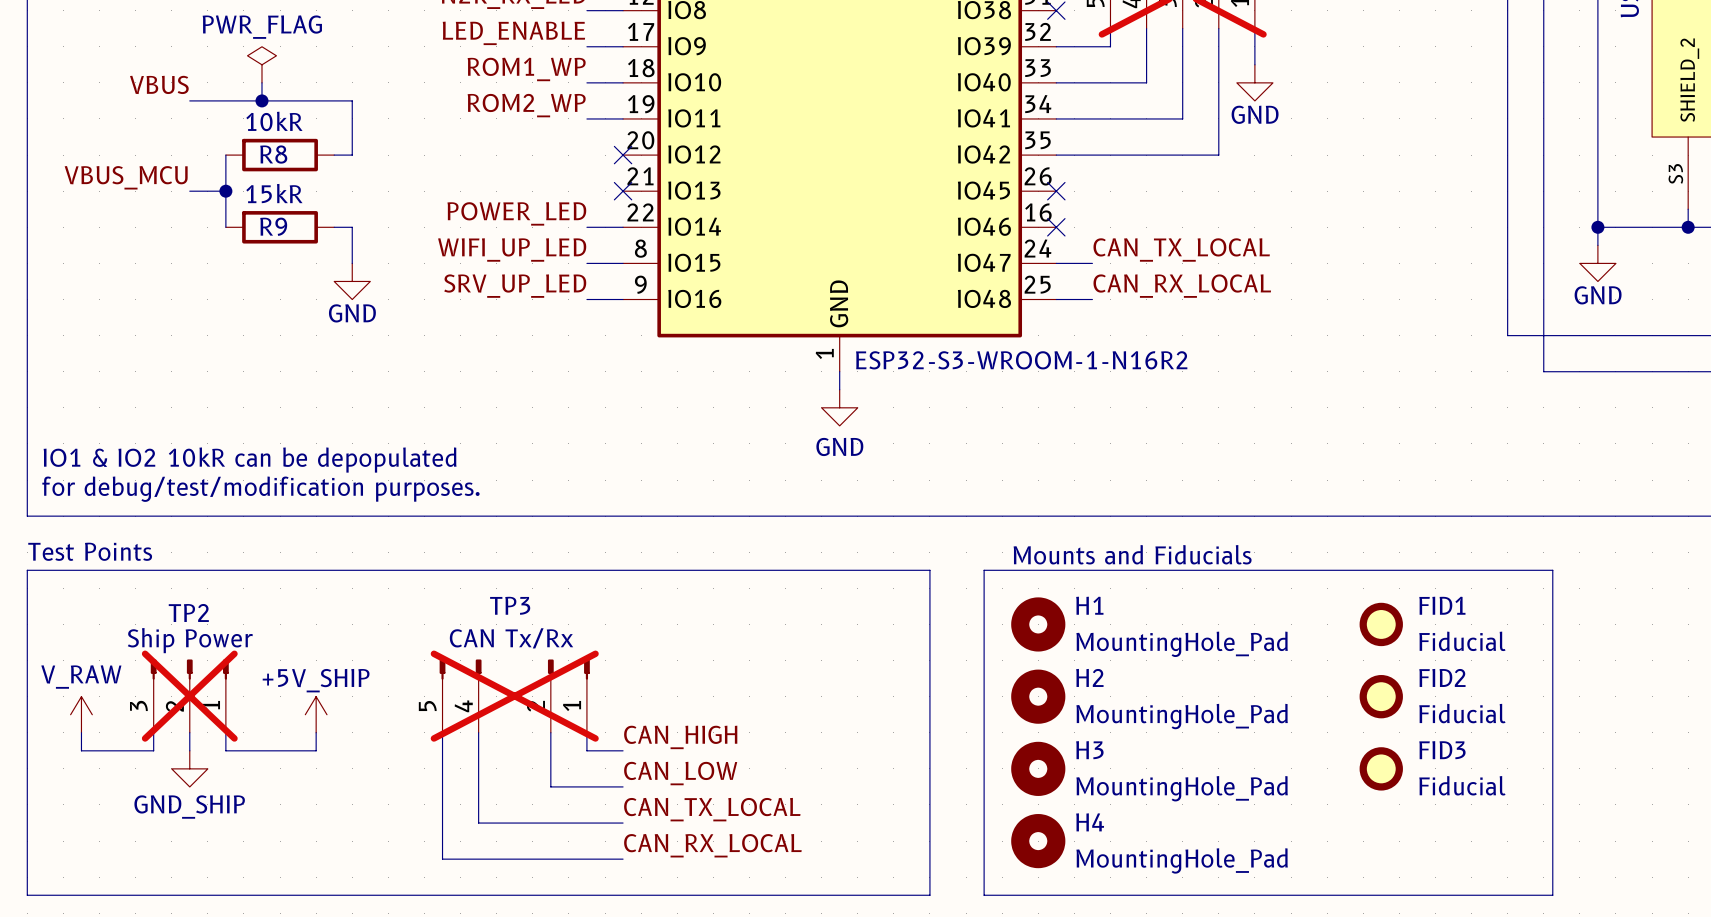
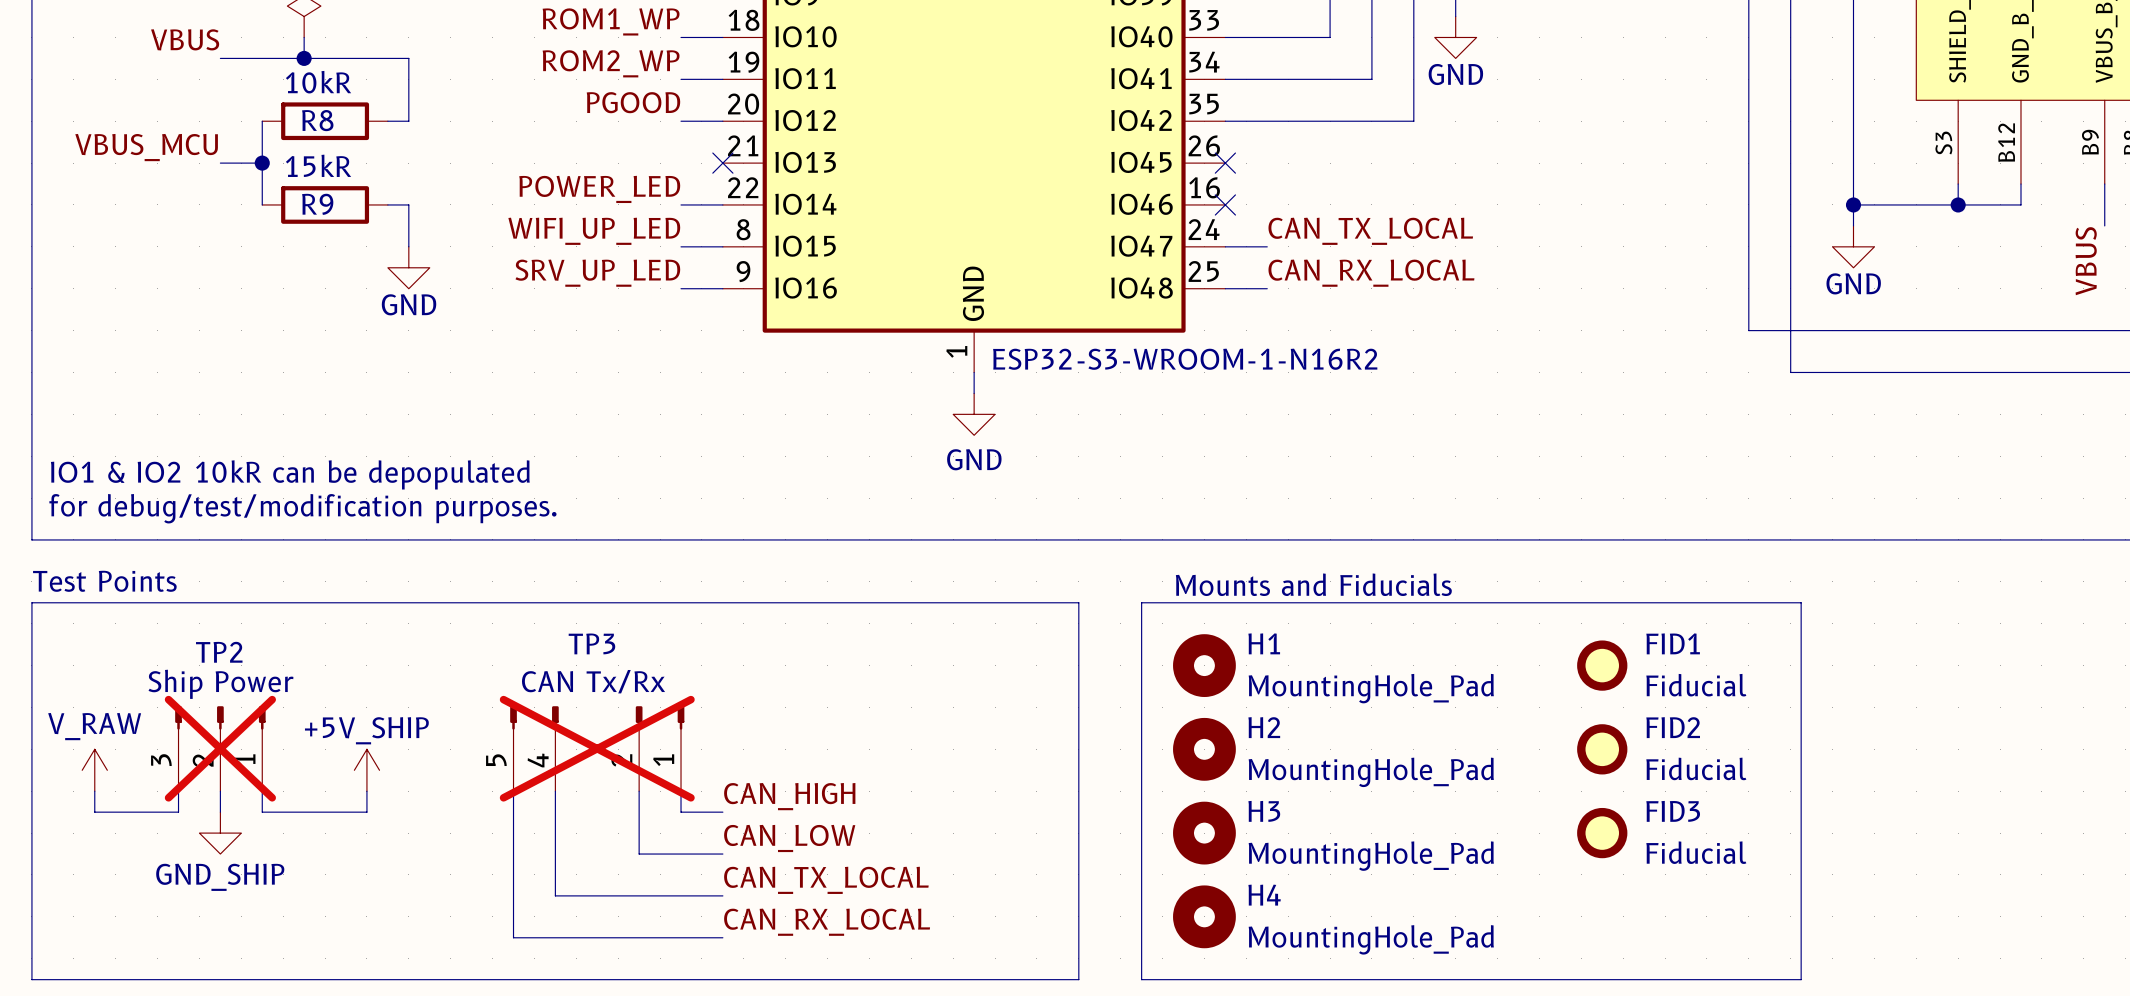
label: none -> PGOOD (633, 102)
wire: none -> (681, 121) (722, 121)
no-connect mark: (623, 155) -> none

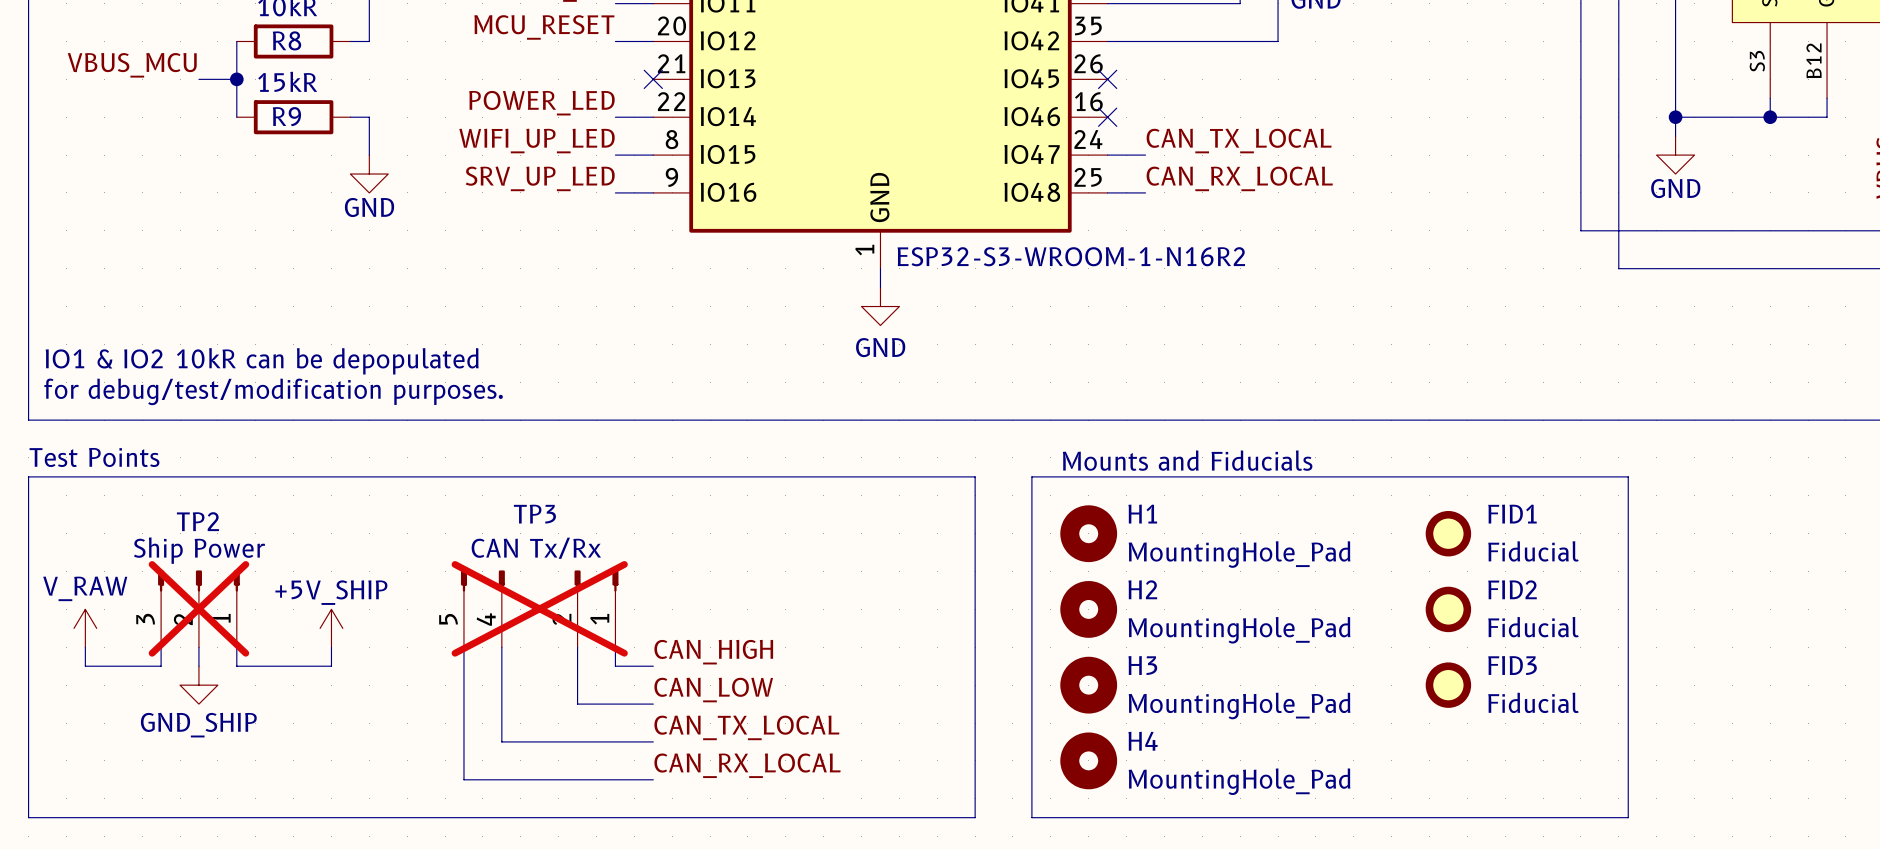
label: PGOOD (633, 102) -> MCU_RESET (544, 27)

